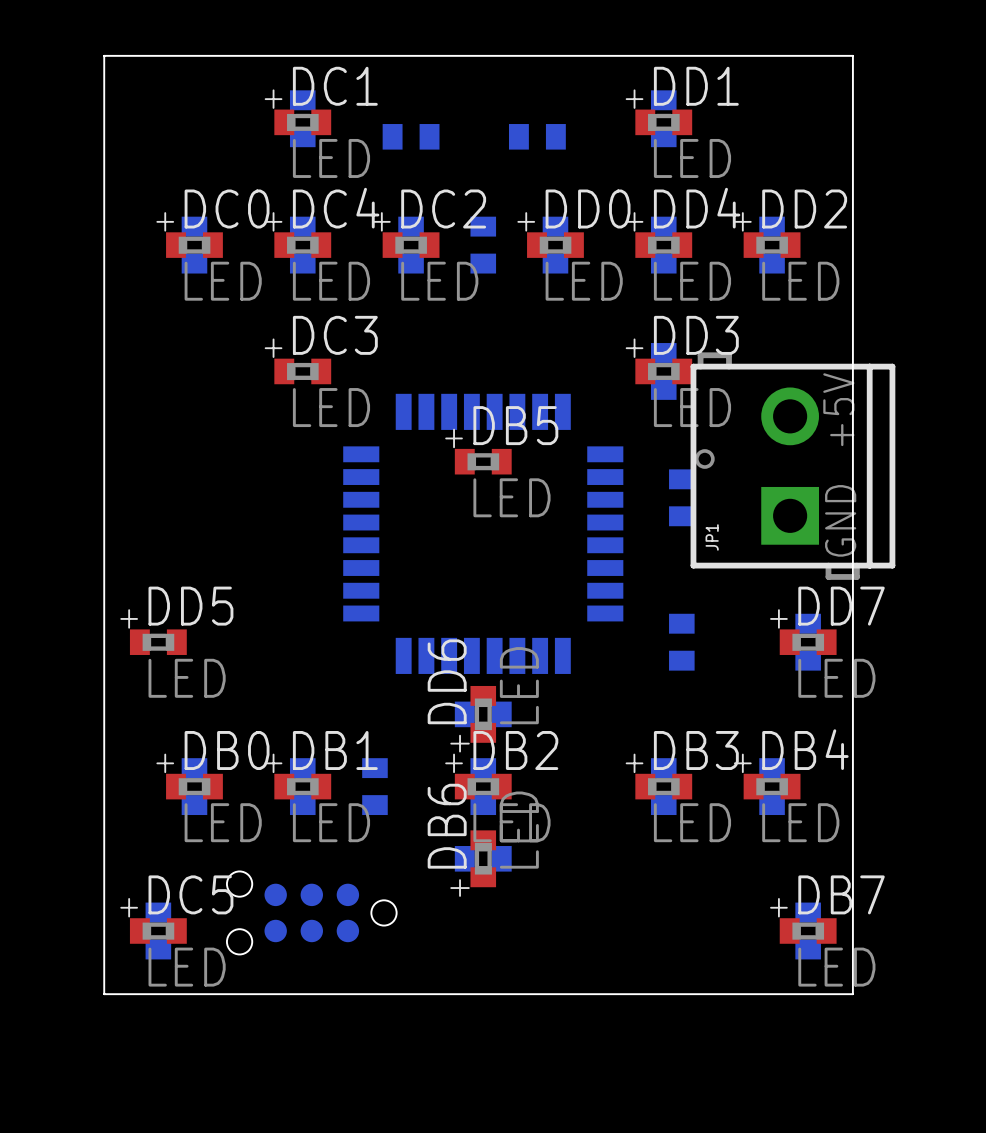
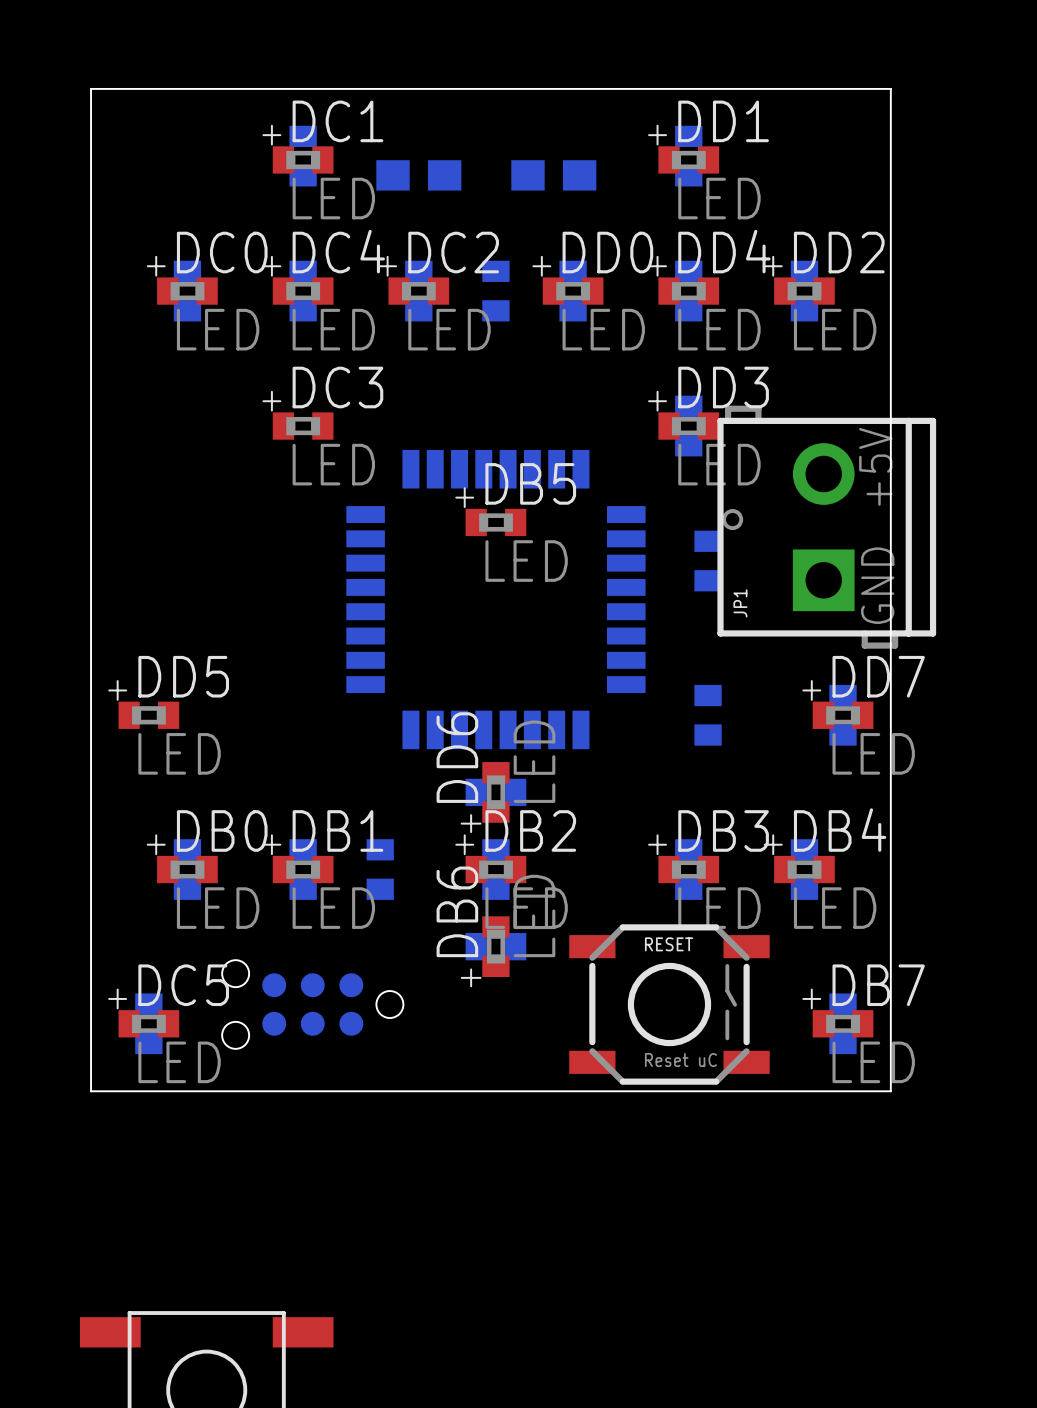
part footprint: [382, 124, 440, 150] -> [376, 160, 462, 191]
part footprint: [508, 124, 566, 150] -> [511, 160, 597, 191]
RESET: none -> Reset uC (669, 1004)

